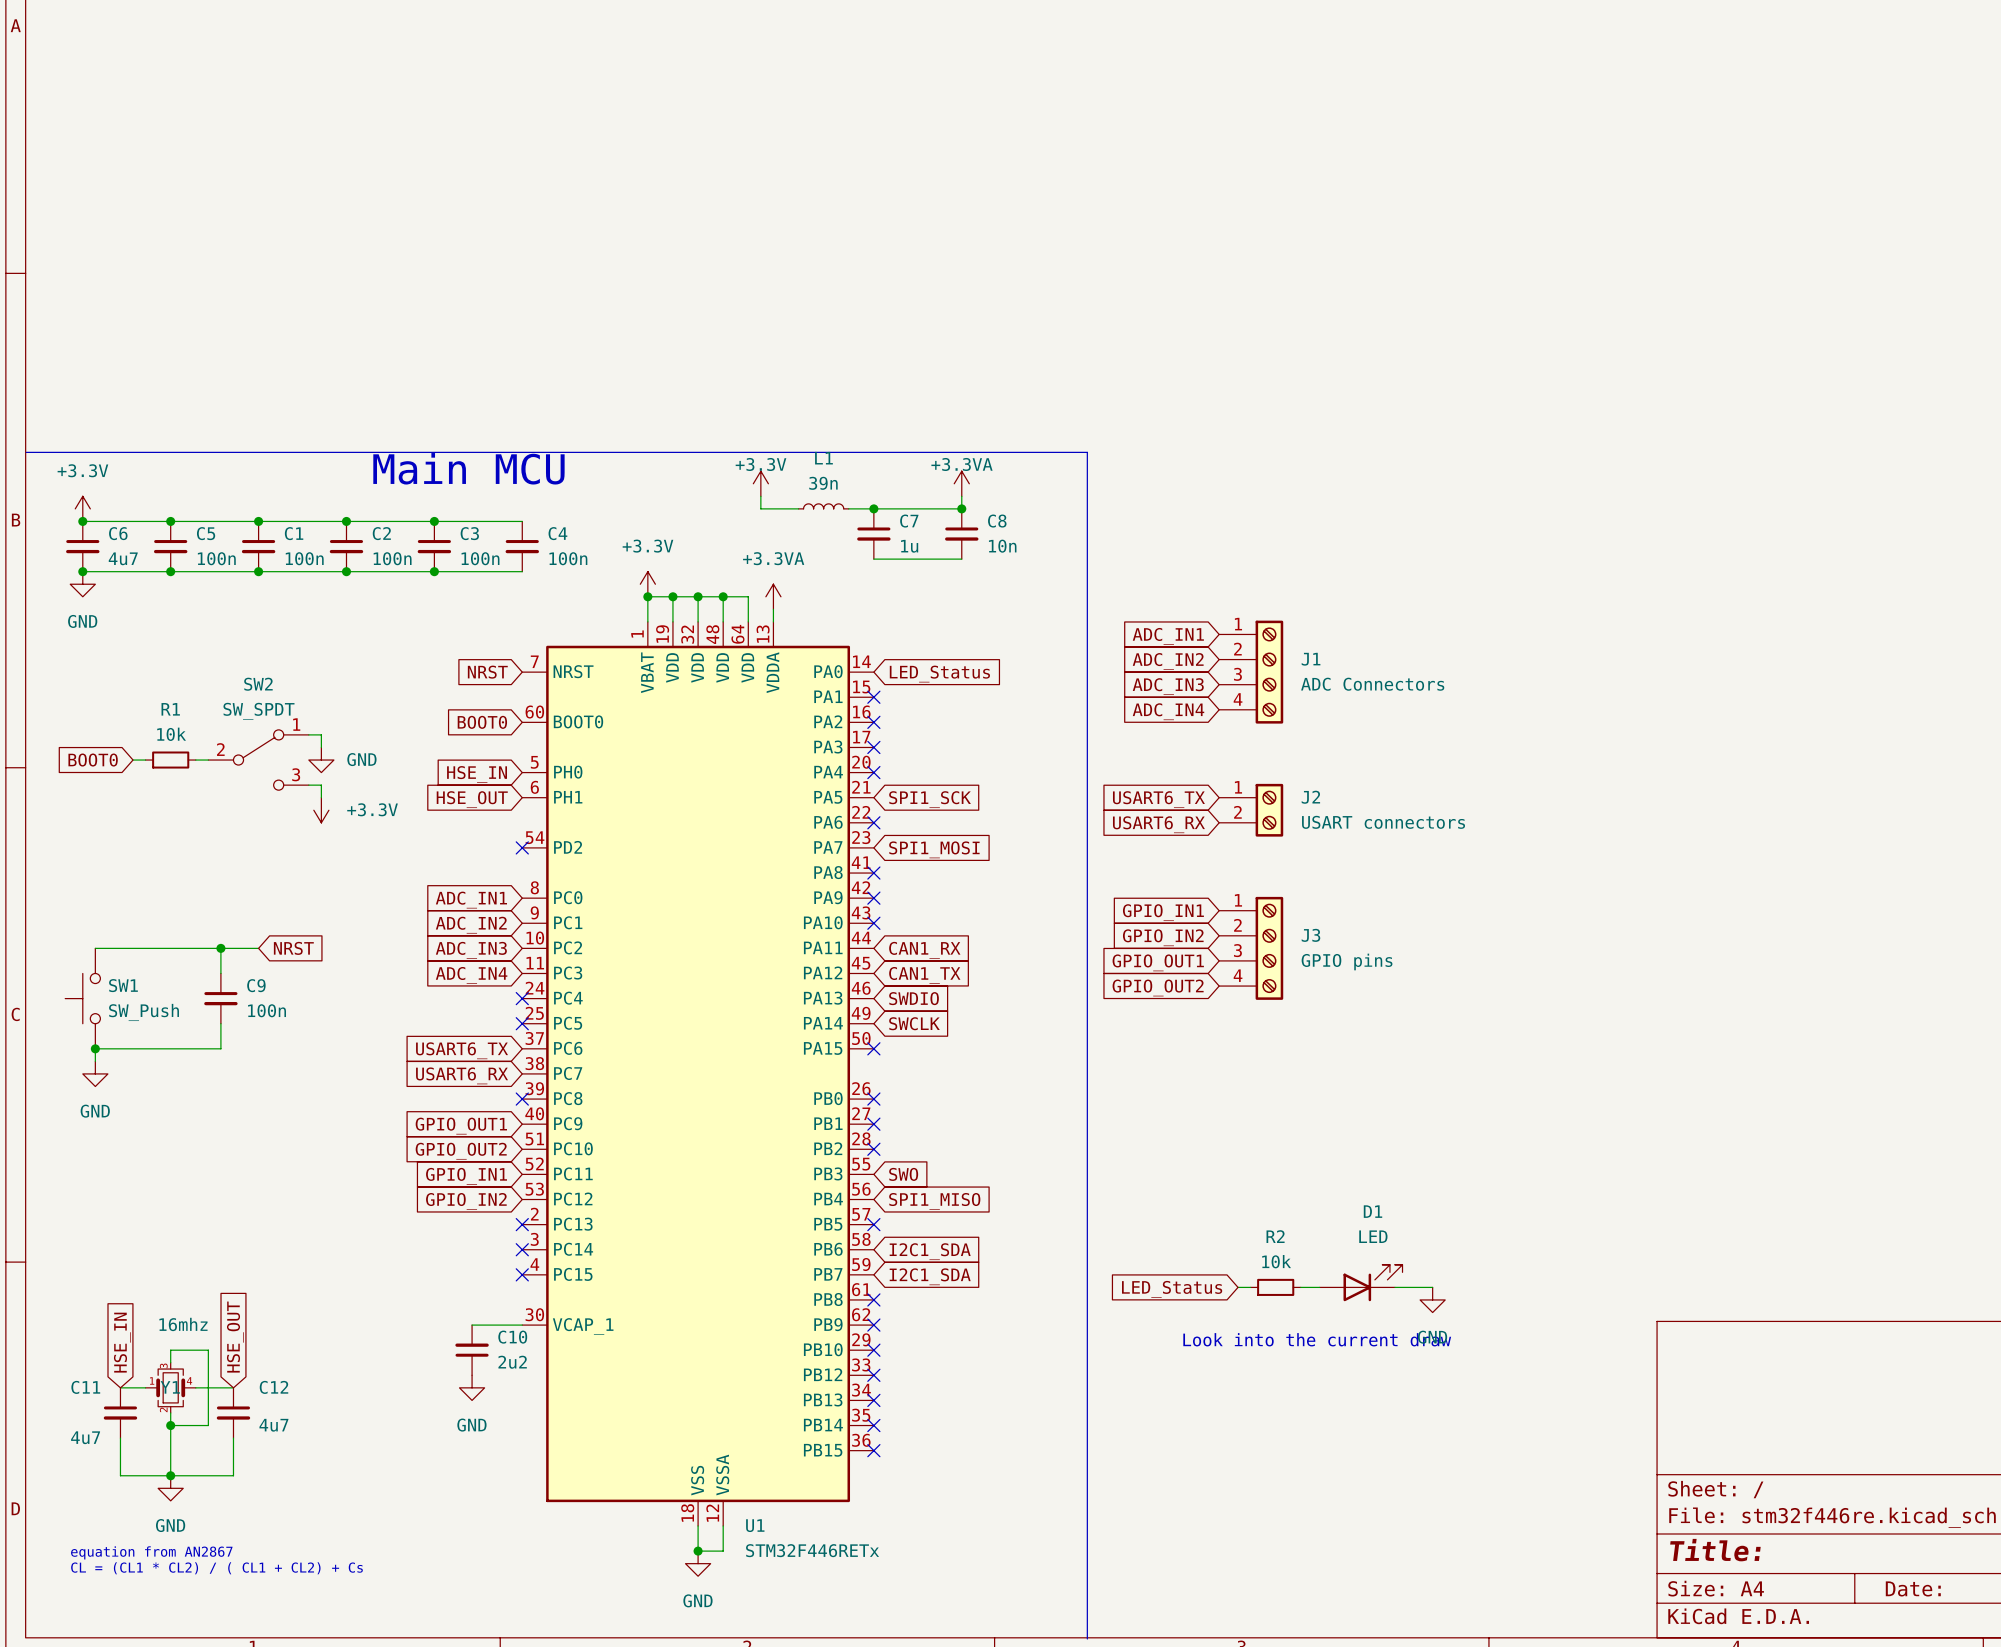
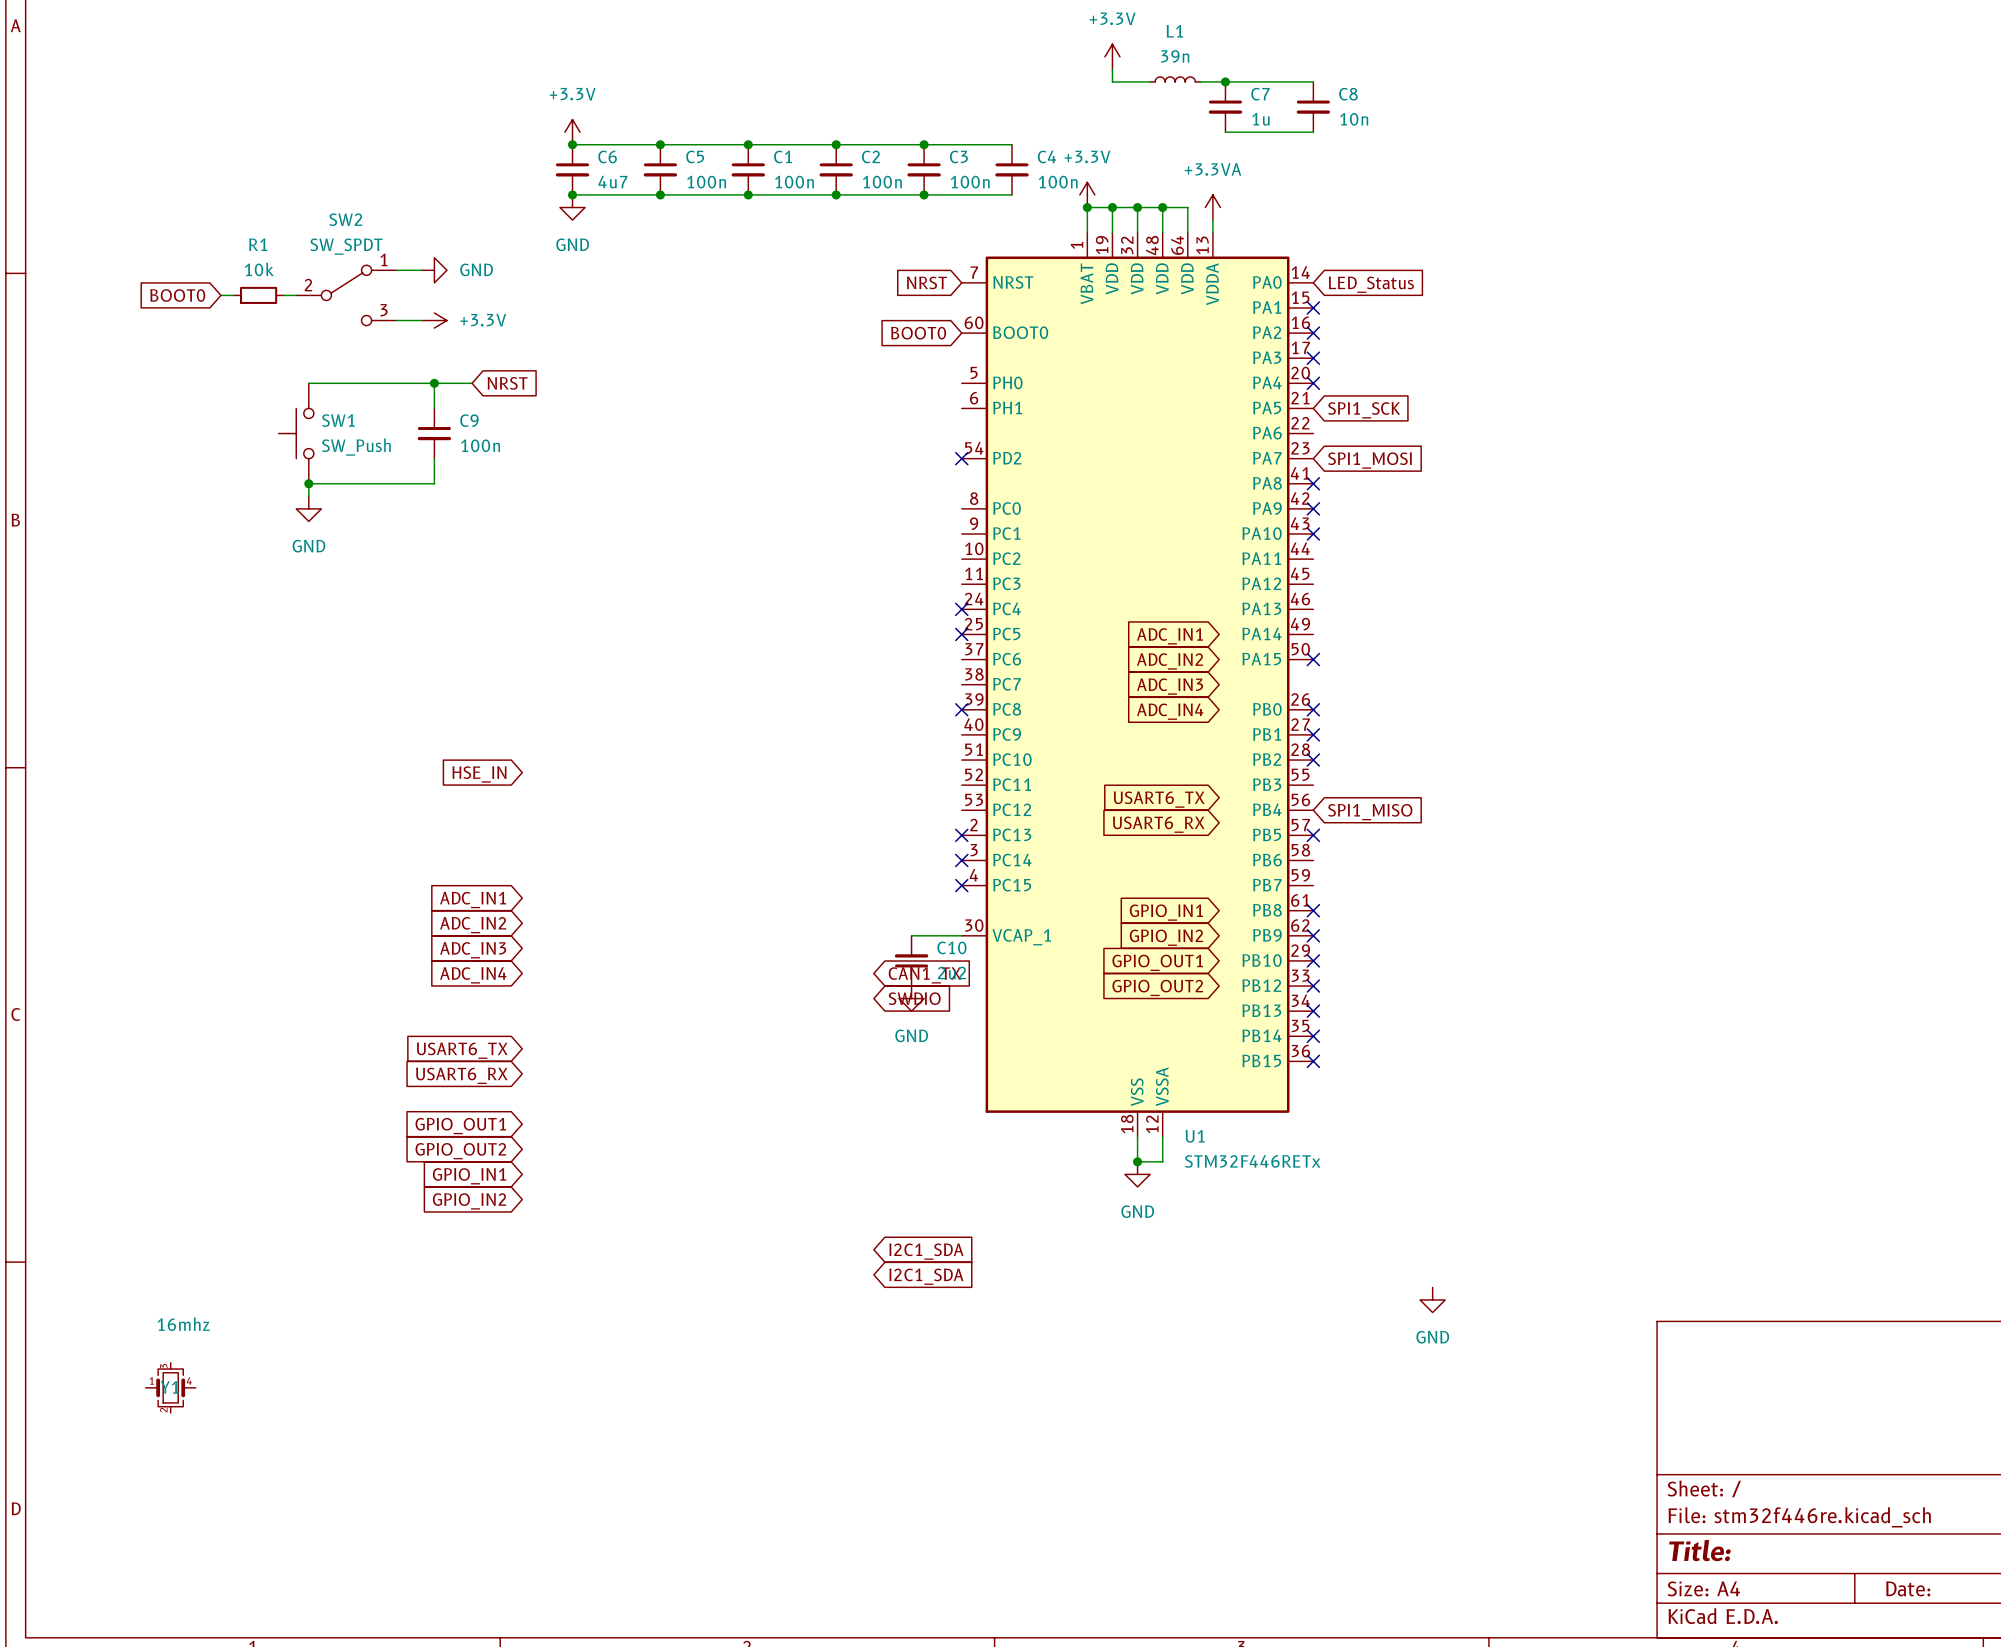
power symbol: none -> +3.3V (1112, 56)
wire: none -> (1112, 69) (1112, 81) (1150, 81)
wire: none -> (1200, 81) (1313, 81)
junction: none -> (1225, 81)
power symbol: none -> +3.3V (572, 132)
wire: none -> (1225, 132) (1313, 132)
wire: none -> (572, 144) (1012, 144)
junction: none -> (572, 144)
junction: none -> (660, 144)
junction: none -> (748, 144)
junction: none -> (836, 144)
junction: none -> (924, 144)
wire: none -> (572, 194) (1012, 194)
junction: none -> (572, 194)
junction: none -> (660, 194)
junction: none -> (748, 194)
junction: none -> (836, 194)
junction: none -> (924, 194)
power symbol: none -> +3.3V (1087, 194)
power symbol: none -> GND (572, 207)
junction: none -> (1087, 207)
wire: none -> (1112, 207) (1112, 232)
junction: none -> (1112, 207)
wire: none -> (1137, 207) (1137, 232)
junction: none -> (1137, 207)
wire: none -> (1162, 207) (1162, 232)
junction: none -> (1162, 207)
power symbol: none -> +3.3VA (1212, 207)
wire: none -> (1212, 220) (1212, 232)
wire: none -> (1087, 232) (1087, 207) (1187, 207) (1187, 232)
wire: none -> (396, 270) (421, 270)
power symbol: none -> GND (434, 270)
global label: none -> NRST (926, 282)
global label: none -> LED_Status (1371, 284)
global label: none -> BOOT0 (177, 295)
wire: none -> (220, 295) (233, 295)
wire: none -> (283, 295) (296, 295)
no-connect mark: none -> (1313, 307)
wire: none -> (396, 320) (421, 320)
power symbol: none -> +3.3V (434, 320)
global label: none -> BOOT0 (918, 333)
no-connect mark: none -> (1313, 333)
no-connect mark: none -> (1313, 358)
wire: none -> (308, 383) (472, 383)
wire: none -> (434, 383) (434, 408)
junction: none -> (434, 383)
global label: none -> NRST (507, 383)
no-connect mark: none -> (1313, 383)
global label: none -> SPI1_SCK (1364, 410)
line: (26, 452) (1087, 452) (1087, 1639) -> none
wire: none -> (434, 458) (434, 483) (308, 483) (308, 496)
no-connect mark: none -> (961, 458)
global label: none -> SPI1_MOSI (1369, 460)
text: Main MCU (468, 468) -> none
junction: none -> (308, 483)
power symbol: +3.3V (760, 483) -> none
power symbol: +3.3VA (961, 483) -> none
no-connect mark: none -> (1313, 483)
wire: (760, 496) (760, 508) (798, 508) -> none
wire: (961, 496) (961, 508) (848, 508) -> none
L1 position: (823, 506) -> (1175, 79)
power symbol: +3.3V (82, 508) -> none
power symbol: none -> GND (308, 508)
junction: (873, 508) -> none
junction: (961, 508) -> none
no-connect mark: none -> (1313, 508)
wire: (82, 521) (522, 521) -> none
junction: (82, 521) -> none
junction: (170, 521) -> none
junction: (258, 521) -> none
junction: (346, 521) -> none
junction: (434, 521) -> none
C7 position: (873, 534) -> (1225, 107)
C8 position: (961, 534) -> (1313, 107)
no-connect mark: none -> (1313, 534)
C6 position: (82, 546) -> (572, 169)
C5 position: (170, 546) -> (660, 169)
C1 position: (258, 546) -> (748, 169)
C2 position: (346, 546) -> (836, 169)
C3 position: (434, 546) -> (924, 169)
C4 position: (522, 546) -> (1012, 169)
wire: (873, 559) (961, 559) -> none
wire: (82, 571) (522, 571) -> none
junction: (82, 571) -> none
junction: (170, 571) -> none
junction: (258, 571) -> none
junction: (346, 571) -> none
junction: (434, 571) -> none
power symbol: GND (82, 584) -> none
power symbol: +3.3V (647, 584) -> none
junction: (647, 596) -> none
wire: (672, 596) (672, 621) -> none
junction: (672, 596) -> none
wire: (698, 596) (698, 621) -> none
junction: (698, 596) -> none
wire: (723, 596) (723, 621) -> none
junction: (723, 596) -> none
power symbol: +3.3VA (773, 596) -> none
wire: (773, 609) (773, 621) -> none
no-connect mark: none -> (961, 609)
wire: (647, 621) (647, 596) (748, 596) (748, 621) -> none
no-connect mark: none -> (961, 634)
no-connect mark: none -> (1313, 659)
global label: NRST (487, 672) -> none
J1: ADC Connectors (1251, 672) -> none
global label: LED_Status (939, 674) -> none
no-connect mark: (873, 697) -> none
no-connect mark: none -> (961, 709)
no-connect mark: none -> (1313, 709)
global label: BOOT0 (482, 722) -> none
no-connect mark: (873, 722) -> none
wire: (308, 734) (321, 734) (321, 747) -> none
no-connect mark: none -> (1313, 734)
no-connect mark: (873, 747) -> none
global label: BOOT0 (93, 760) -> none
wire: (133, 760) (145, 760) -> none
R1 position: (170, 760) -> (258, 295)
wire: (195, 760) (208, 760) -> none
SW2 position: (258, 760) -> (346, 295)
power symbol: GND (321, 760) -> none
no-connect mark: none -> (1313, 760)
no-connect mark: (873, 772) -> none
wire: (308, 785) (321, 785) (321, 797) -> none
global label: HSE_OUT (472, 799) -> none
global label: SPI1_SCK (930, 799) -> none
power symbol: +3.3V (321, 810) -> none
J2: USART connectors (1251, 810) -> none
global label: none -> SPI1_MISO (1370, 812)
no-connect mark: (873, 822) -> none
no-connect mark: none -> (961, 835)
no-connect mark: none -> (1313, 835)
no-connect mark: (522, 847) -> none
global label: SPI1_MOSI (934, 849) -> none
no-connect mark: none -> (961, 860)
no-connect mark: (873, 873) -> none
no-connect mark: none -> (961, 885)
no-connect mark: (873, 898) -> none
no-connect mark: none -> (1313, 910)
no-connect mark: (873, 923) -> none
no-connect mark: none -> (1313, 935)
wire: (95, 948) (258, 948) -> none
wire: (220, 948) (220, 973) -> none
junction: (220, 948) -> none
global label: NRST (293, 948) -> none
J3: GPIO pins (1251, 948) -> none
global label: CAN1_RX (924, 950) -> none
no-connect mark: none -> (1313, 960)
no-connect mark: none -> (1313, 986)
SW1 position: (82, 998) -> (296, 433)
C9 position: (220, 998) -> (434, 433)
no-connect mark: (522, 998) -> none
power symbol: none -> GND (911, 998)
no-connect mark: none -> (1313, 1011)
wire: (220, 1023) (220, 1048) (95, 1048) (95, 1061) -> none
no-connect mark: (522, 1023) -> none
global label: SWCLK (914, 1023) -> none
no-connect mark: none -> (1313, 1036)
junction: (95, 1048) -> none
no-connect mark: (873, 1048) -> none
no-connect mark: none -> (1313, 1061)
power symbol: GND (95, 1073) -> none
U1 position: (698, 1073) -> (1137, 684)
no-connect mark: (522, 1099) -> none
no-connect mark: (873, 1099) -> none
no-connect mark: (873, 1124) -> none
wire: none -> (1137, 1136) (1137, 1161) (1162, 1161) (1162, 1136)
no-connect mark: (873, 1149) -> none
junction: none -> (1137, 1161)
global label: SWO (903, 1174) -> none
power symbol: none -> GND (1137, 1174)
global label: SPI1_MISO (934, 1201) -> none
no-connect mark: (522, 1224) -> none
no-connect mark: (873, 1224) -> none
no-connect mark: (522, 1249) -> none
no-connect mark: (522, 1274) -> none
D1: LED (1361, 1283) -> none
wire: (1238, 1287) (1250, 1287) -> none
R2: 10k (1275, 1287) -> none
wire: (1300, 1287) (1319, 1287) -> none
wire: (1394, 1287) (1432, 1287) -> none
global label: LED_Status (1172, 1289) -> none
no-connect mark: (873, 1299) -> none
wire: (472, 1325) (522, 1325) -> none
no-connect mark: (873, 1325) -> none
global label: HSE_OUT (235, 1337) -> none
text: Look into the current draw (1317, 1339) -> none
global label: HSE_IN (122, 1342) -> none
C10 position: (472, 1350) -> (911, 960)
no-connect mark: (873, 1350) -> none
wire: (170, 1362) (170, 1350) (208, 1350) (208, 1425) (170, 1425) -> none
no-connect mark: (873, 1375) -> none
wire: (120, 1387) (145, 1387) -> none
wire: (195, 1387) (233, 1387) -> none
power symbol: GND (472, 1387) -> none
no-connect mark: (873, 1400) -> none
C11: 4u7 (120, 1412) -> none
wire: (170, 1412) (170, 1475) -> none
C12: 4u7 (233, 1412) -> none
junction: (170, 1425) -> none
no-connect mark: (873, 1425) -> none
wire: (120, 1438) (120, 1475) (233, 1475) (233, 1438) -> none
no-connect mark: (873, 1450) -> none
junction: (170, 1475) -> none
power symbol: GND (170, 1488) -> none
wire: (698, 1525) (698, 1551) (723, 1551) (723, 1525) -> none
junction: (698, 1551) -> none
text: equation from AN2867 (151, 1552) -> none
power symbol: GND (698, 1563) -> none
text: CL = (CL1 * CL2) / ( CL1 + CL2) + Cs (216, 1568) -> none

